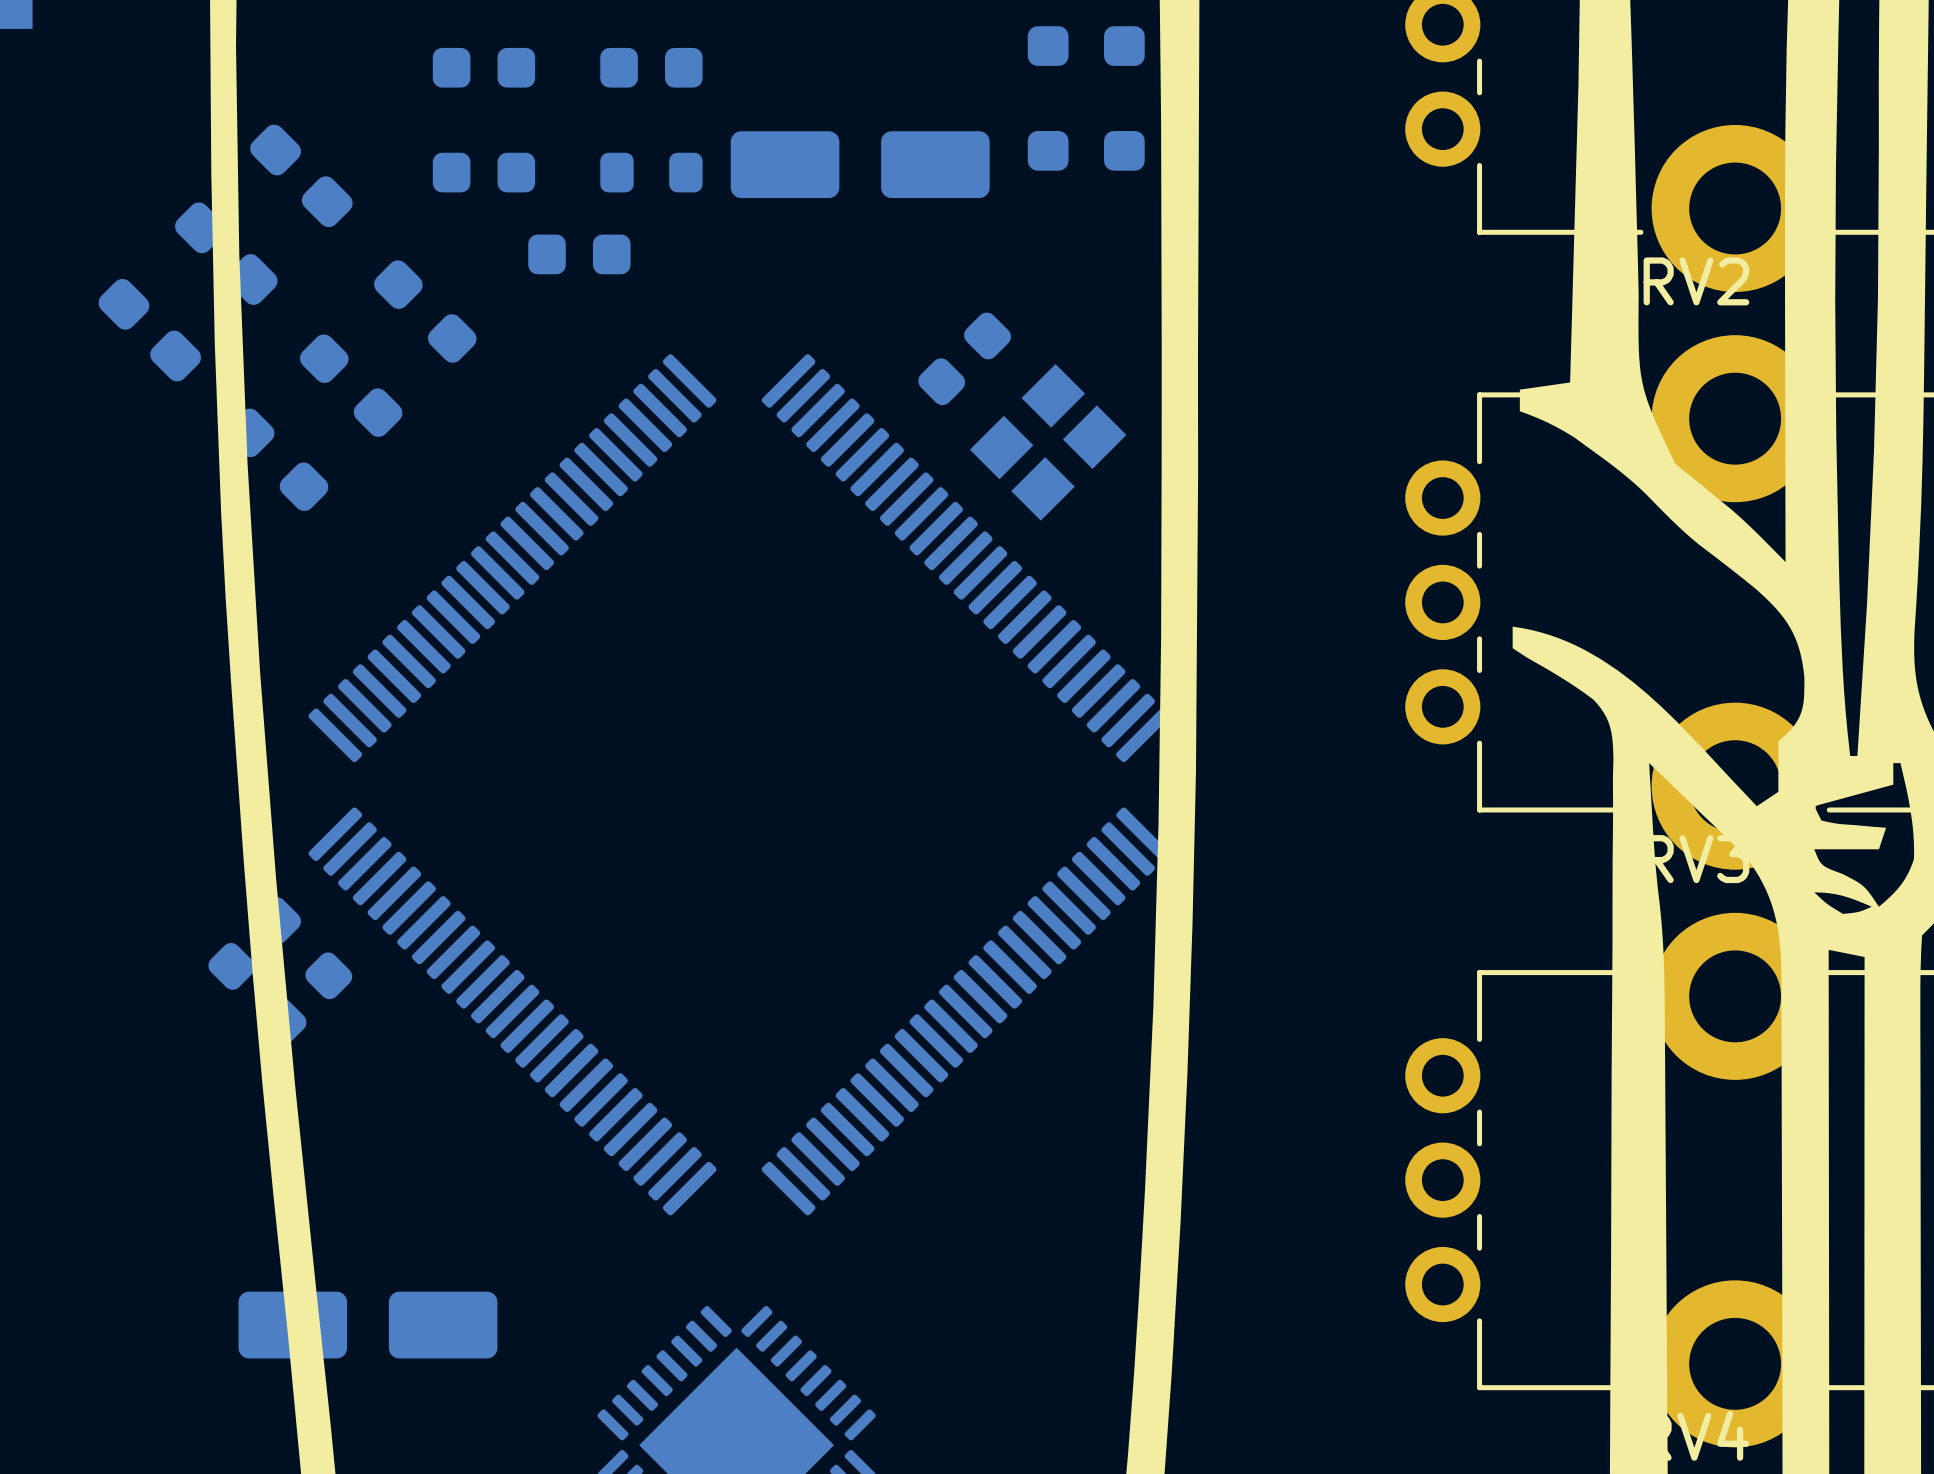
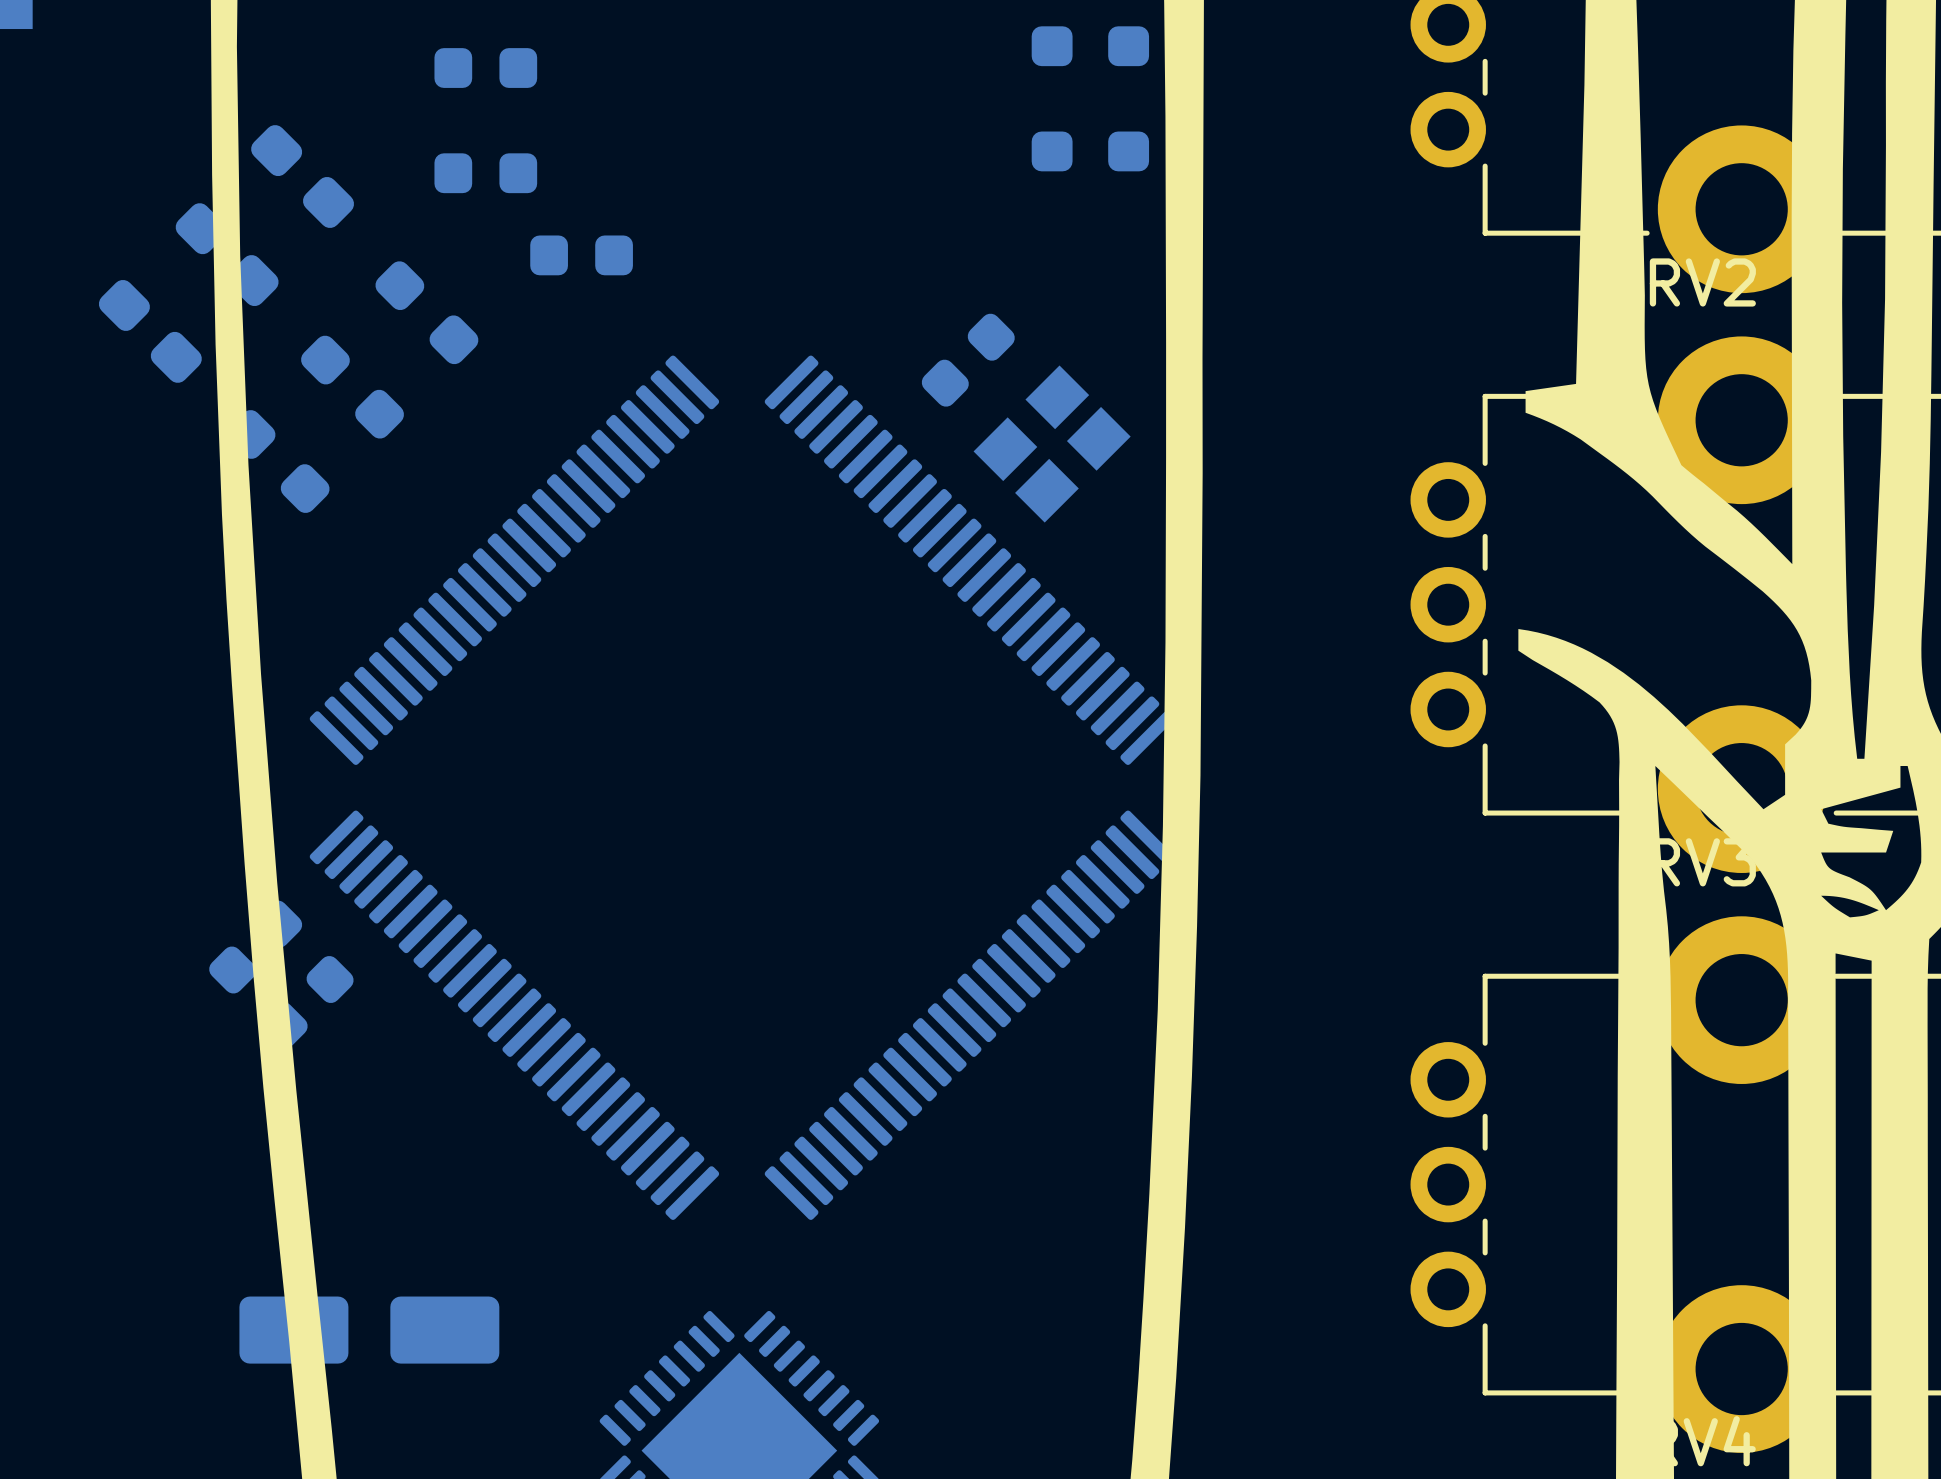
part: (651, 67) -> none
part: (860, 164) -> none
part: (651, 172) -> none

